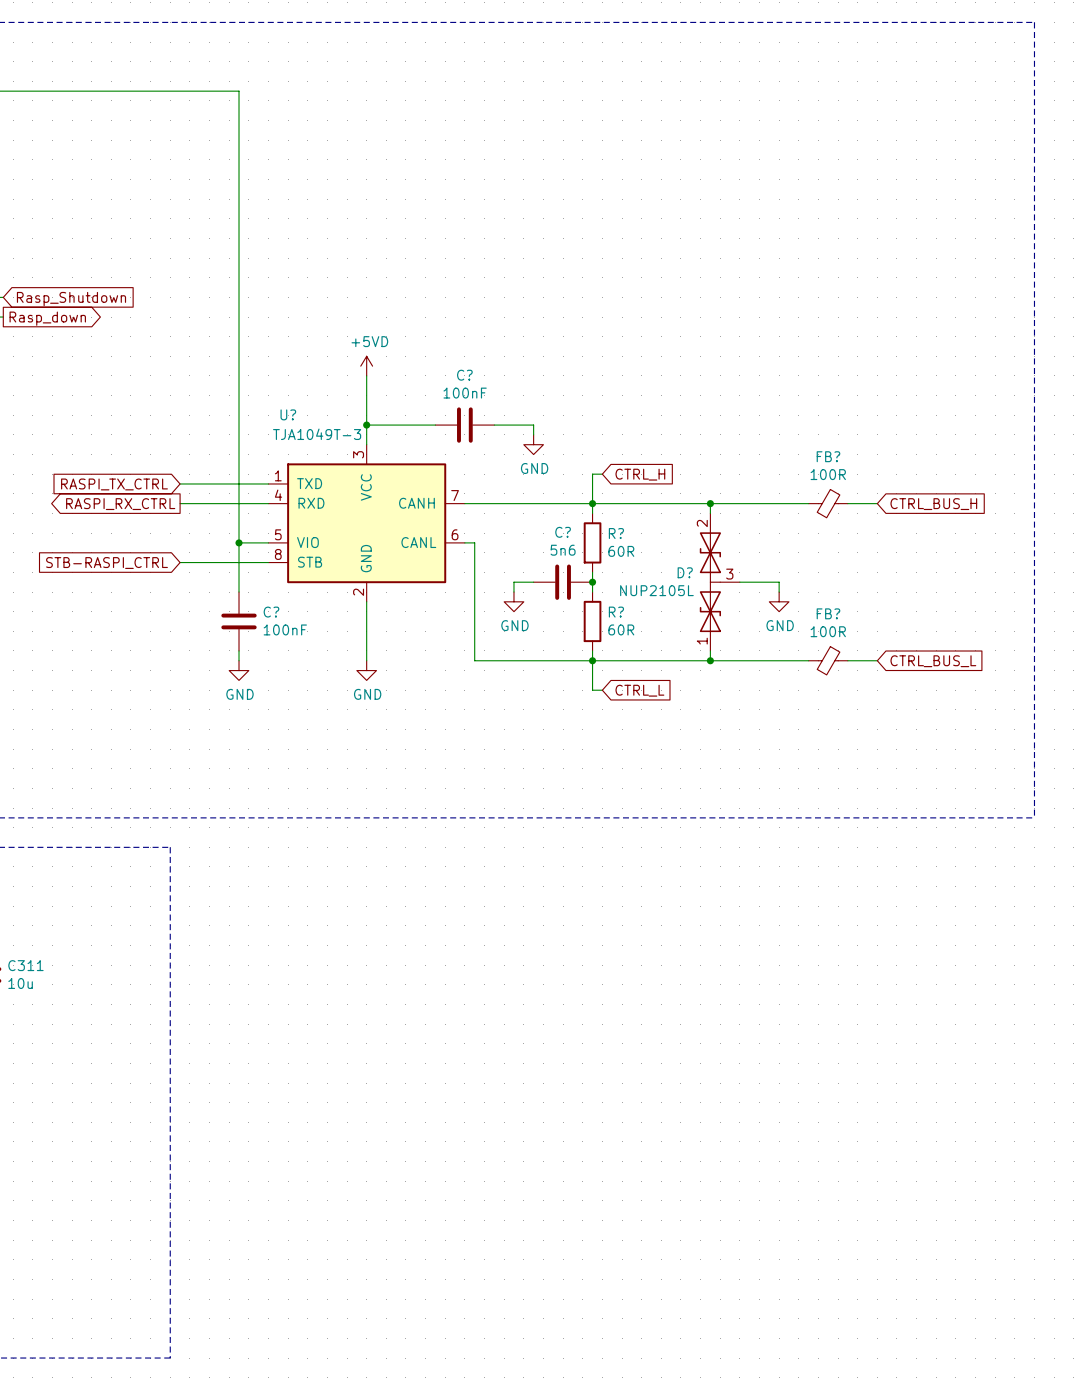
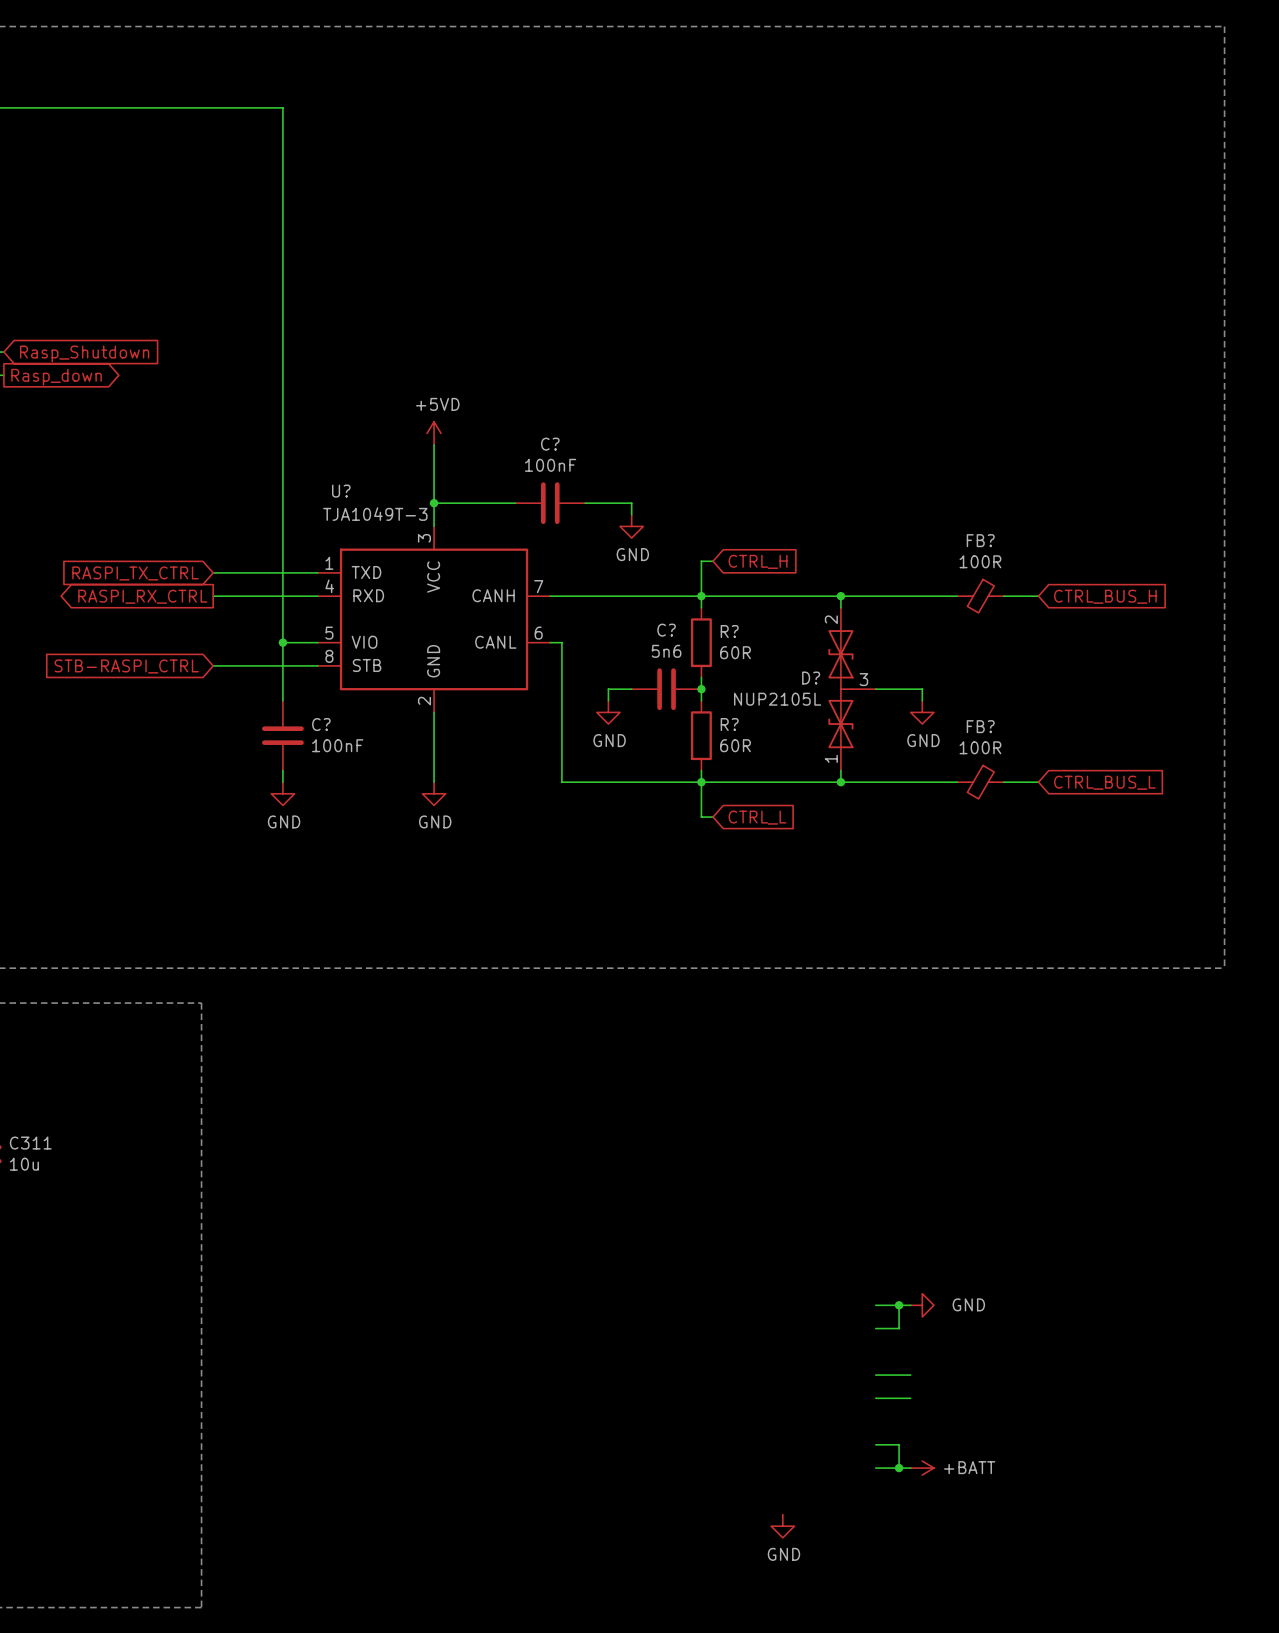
wire: none -> (875, 1305) (910, 1305)
wire: none -> (899, 1305) (899, 1328) (875, 1328)
junction: none -> (899, 1305)
power symbol: none -> GND (922, 1305)
wire: none -> (875, 1375) (910, 1375)
wire: none -> (875, 1398) (910, 1398)
wire: none -> (875, 1444) (899, 1444) (899, 1468)
wire: none -> (875, 1468) (910, 1468)
junction: none -> (899, 1468)
power symbol: none -> +BATT (922, 1468)
power symbol: none -> GND (782, 1526)

